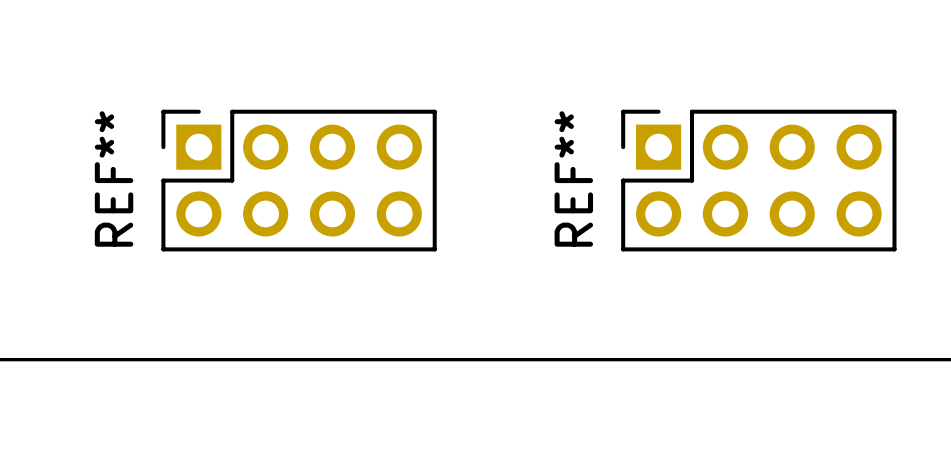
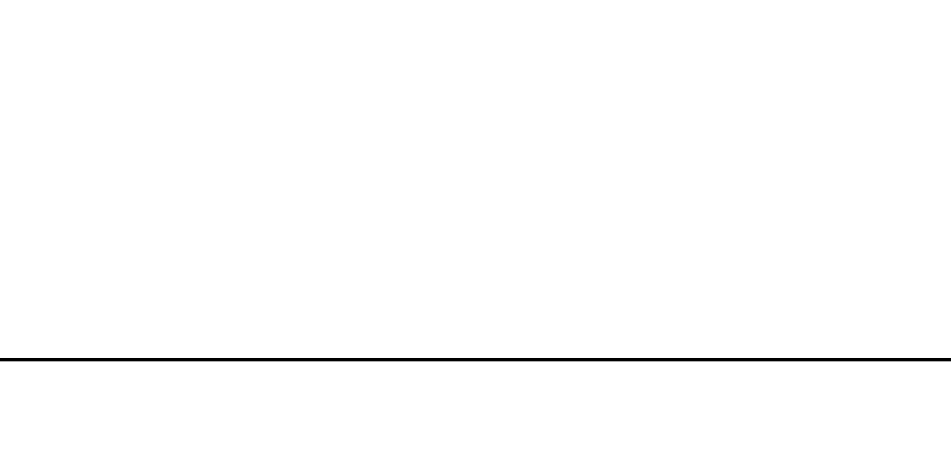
REF**: (299, 180) -> none
REF**: (758, 180) -> none

